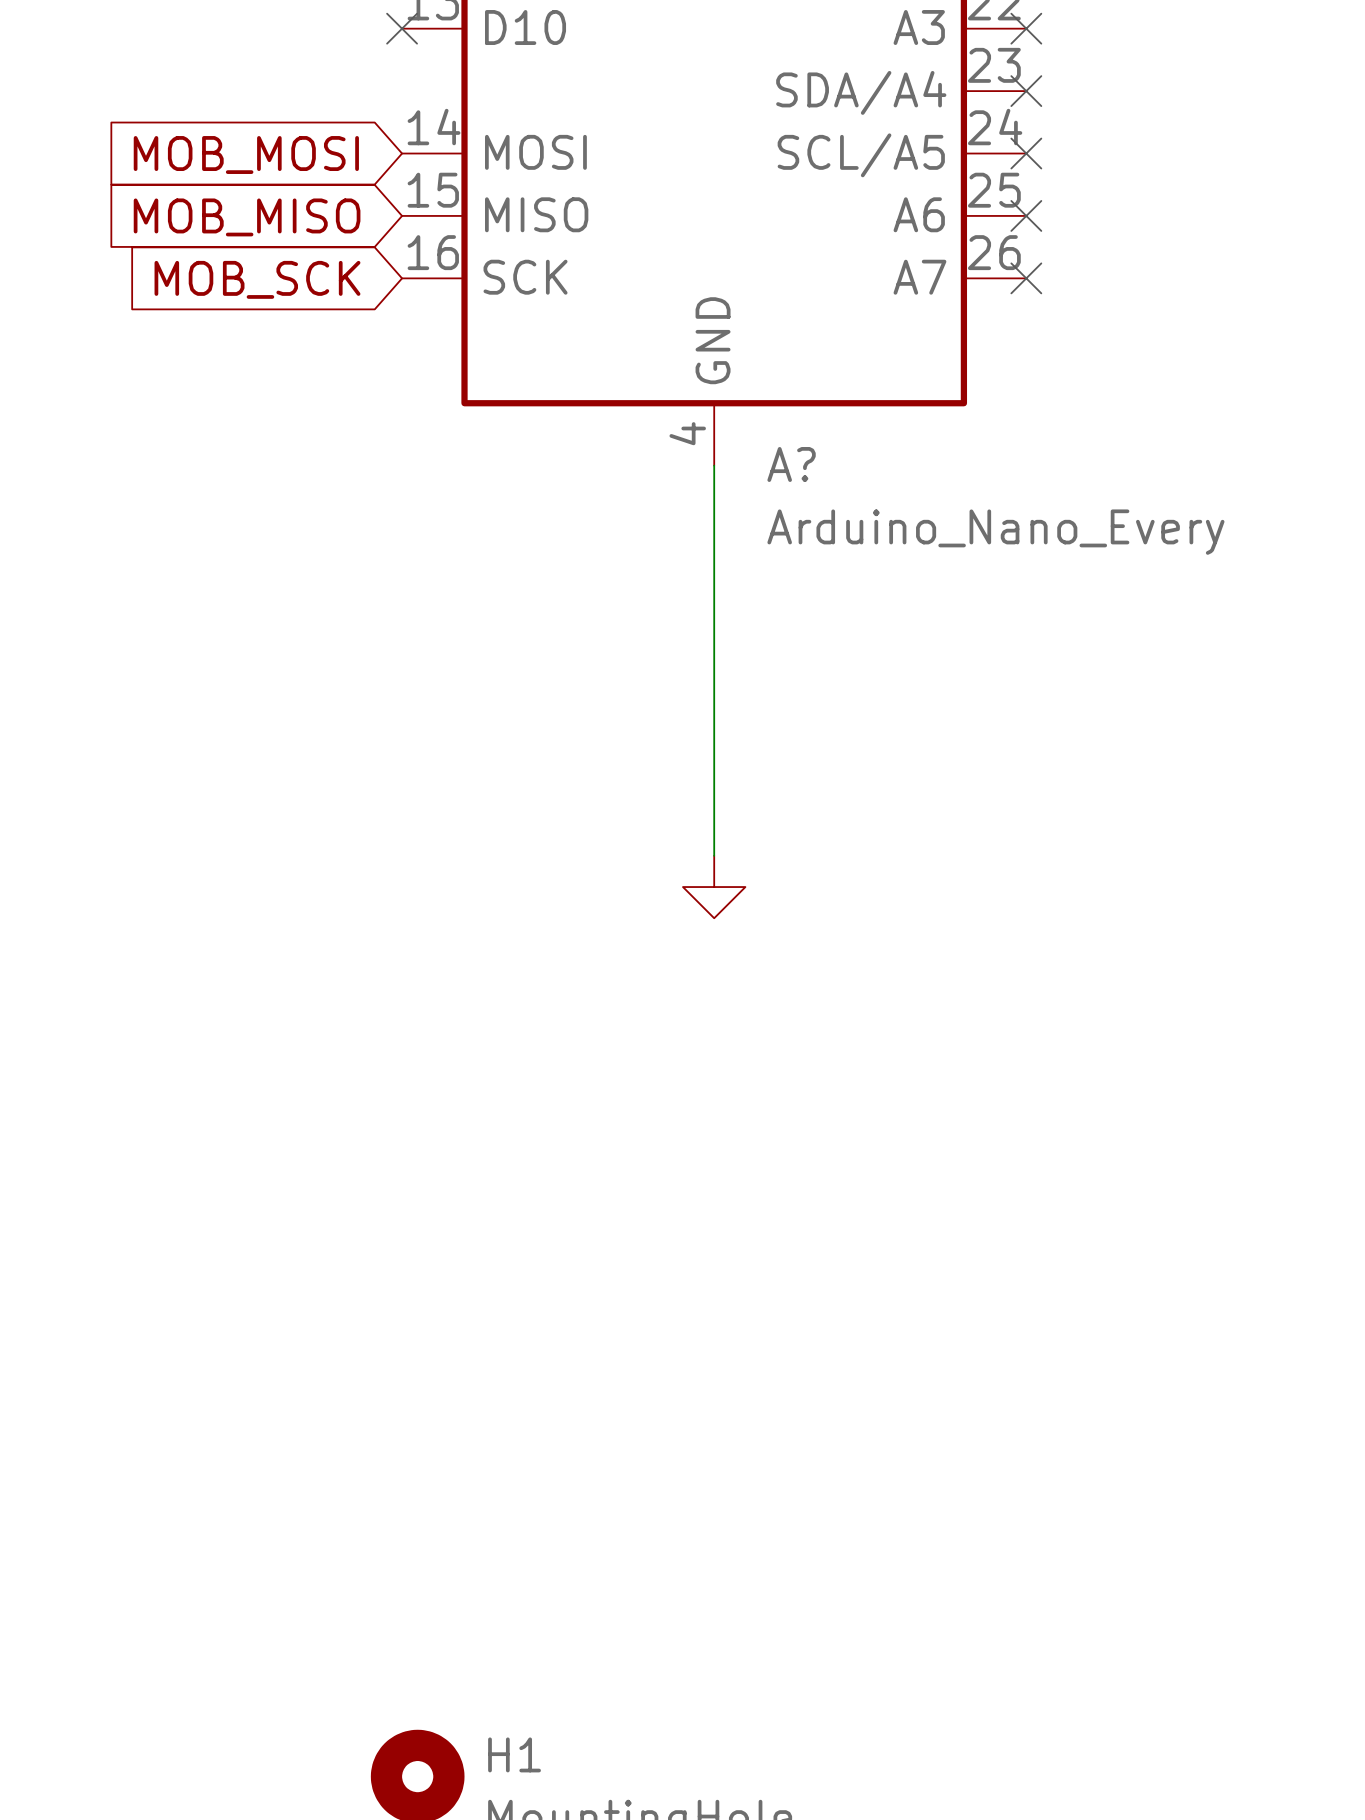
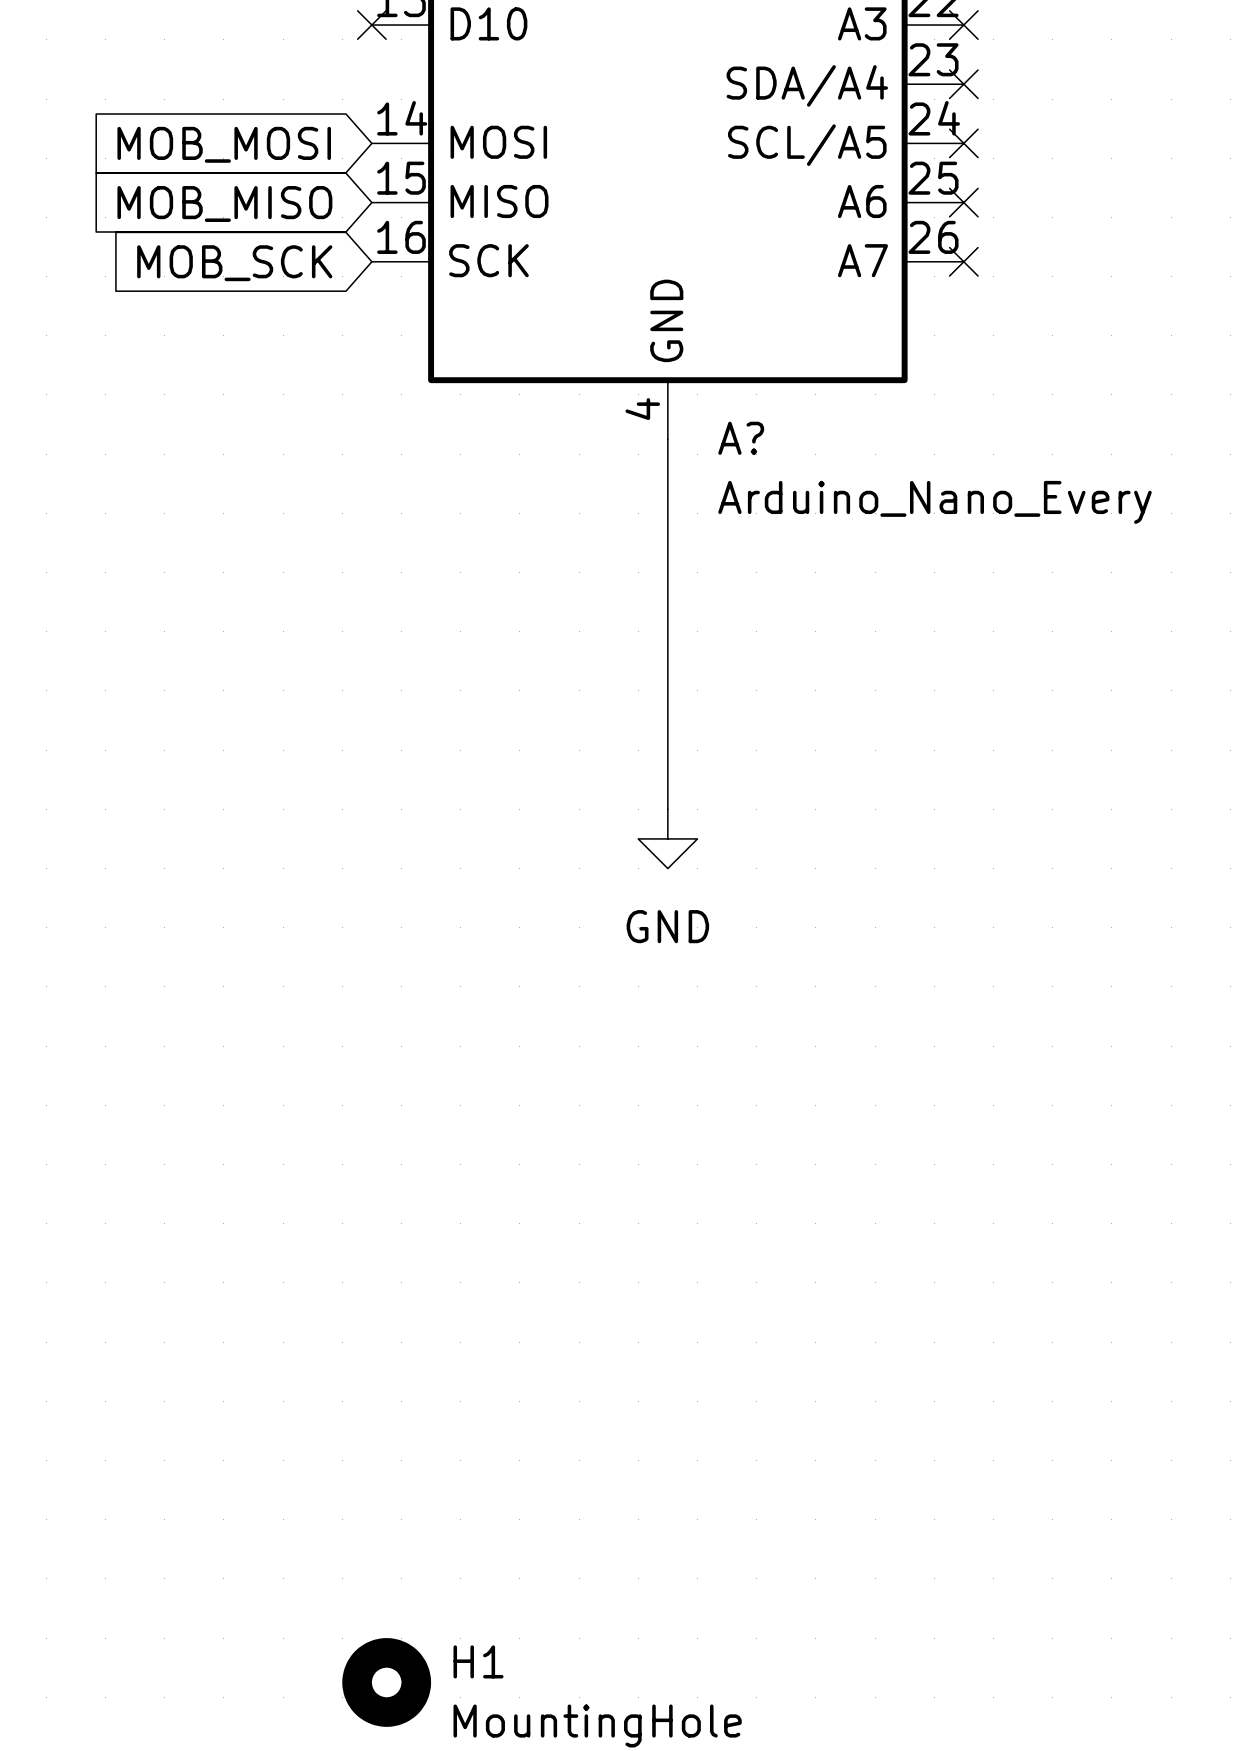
power symbol text: none -> GND (667, 926)

